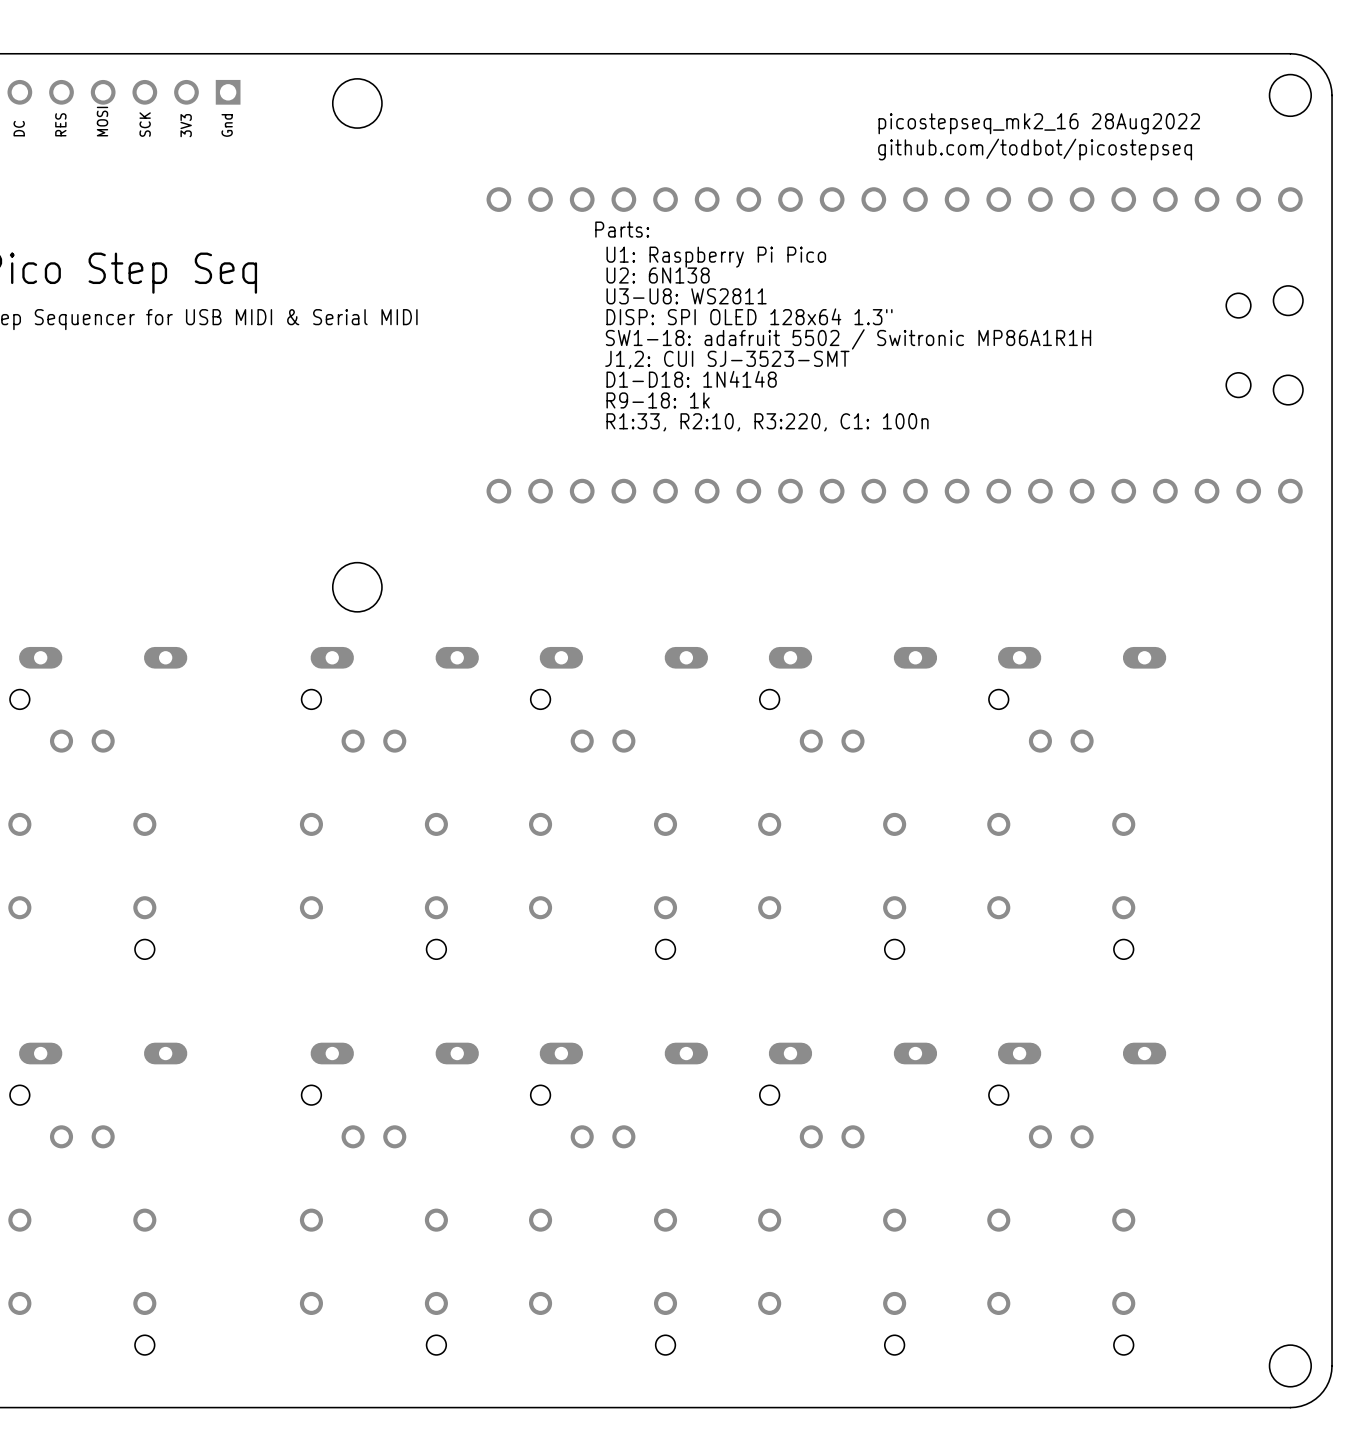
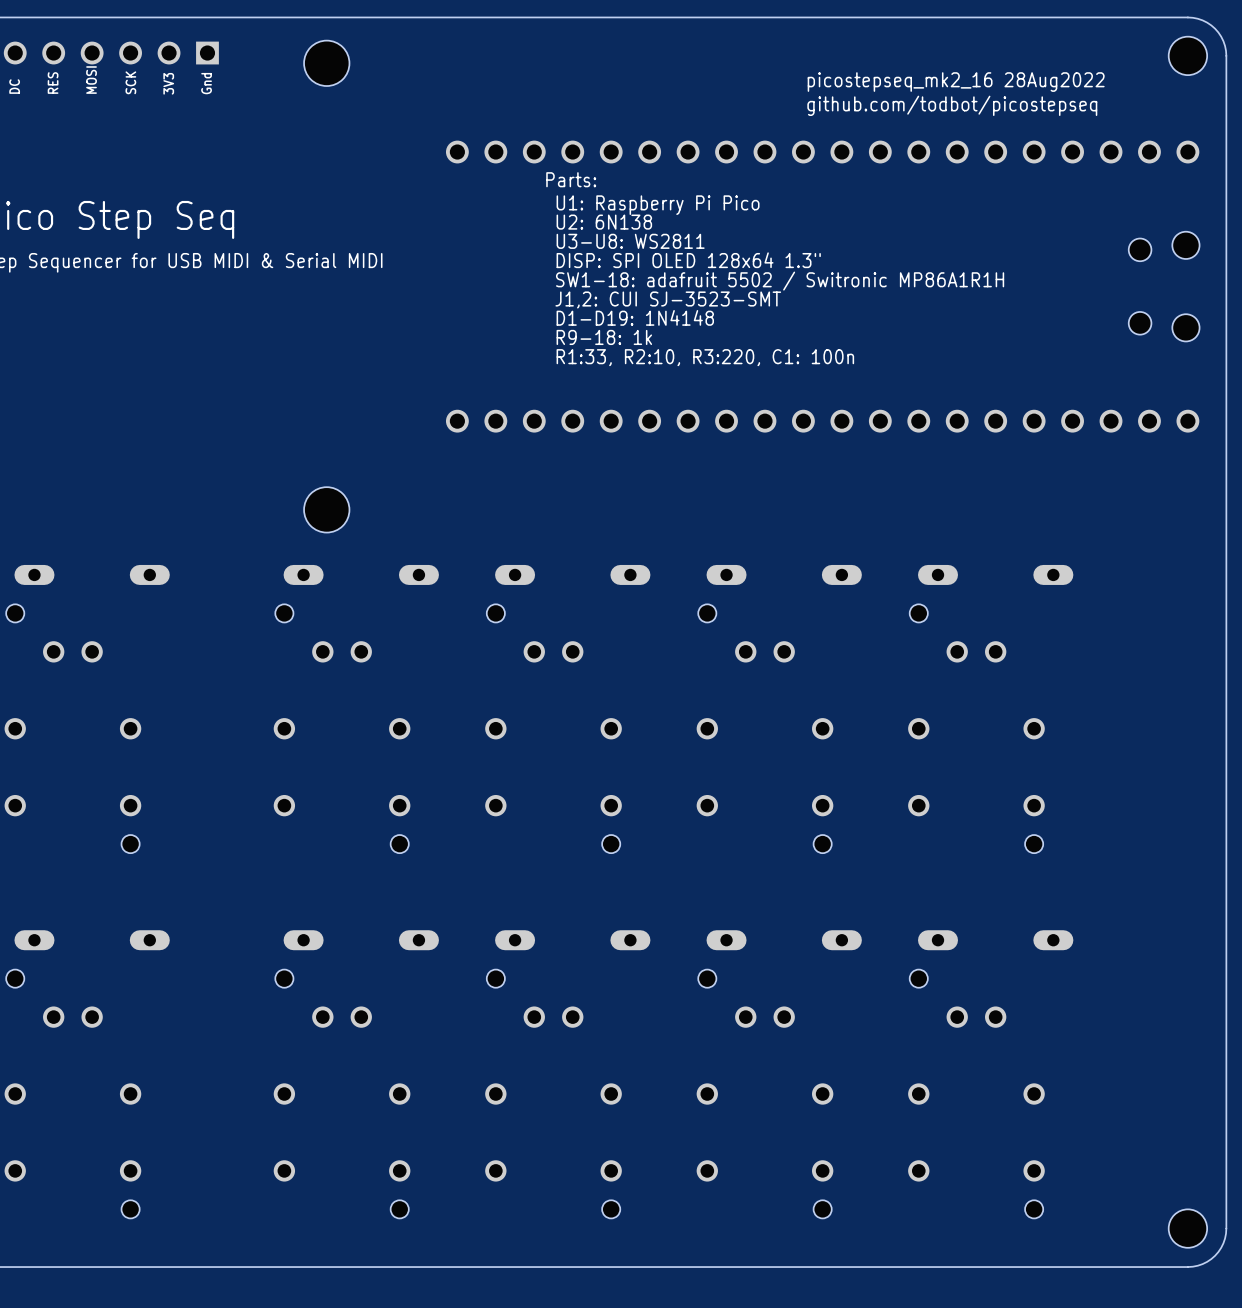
text: D1-D18: 1N4148 (691, 379) -> D1-D19: 1N4148 (635, 317)

